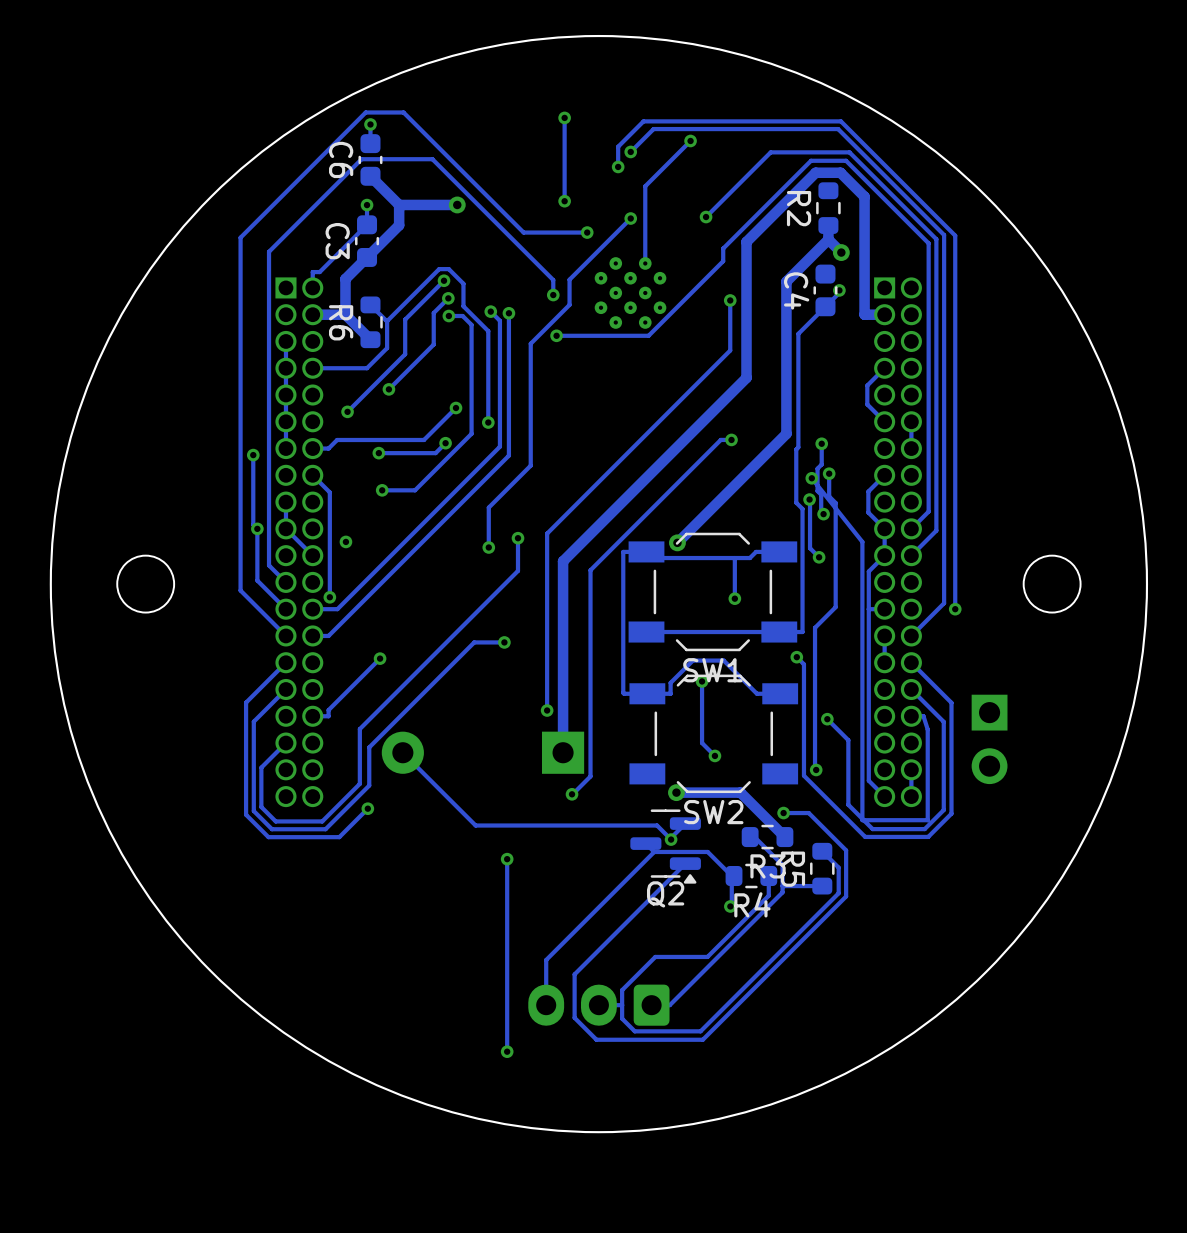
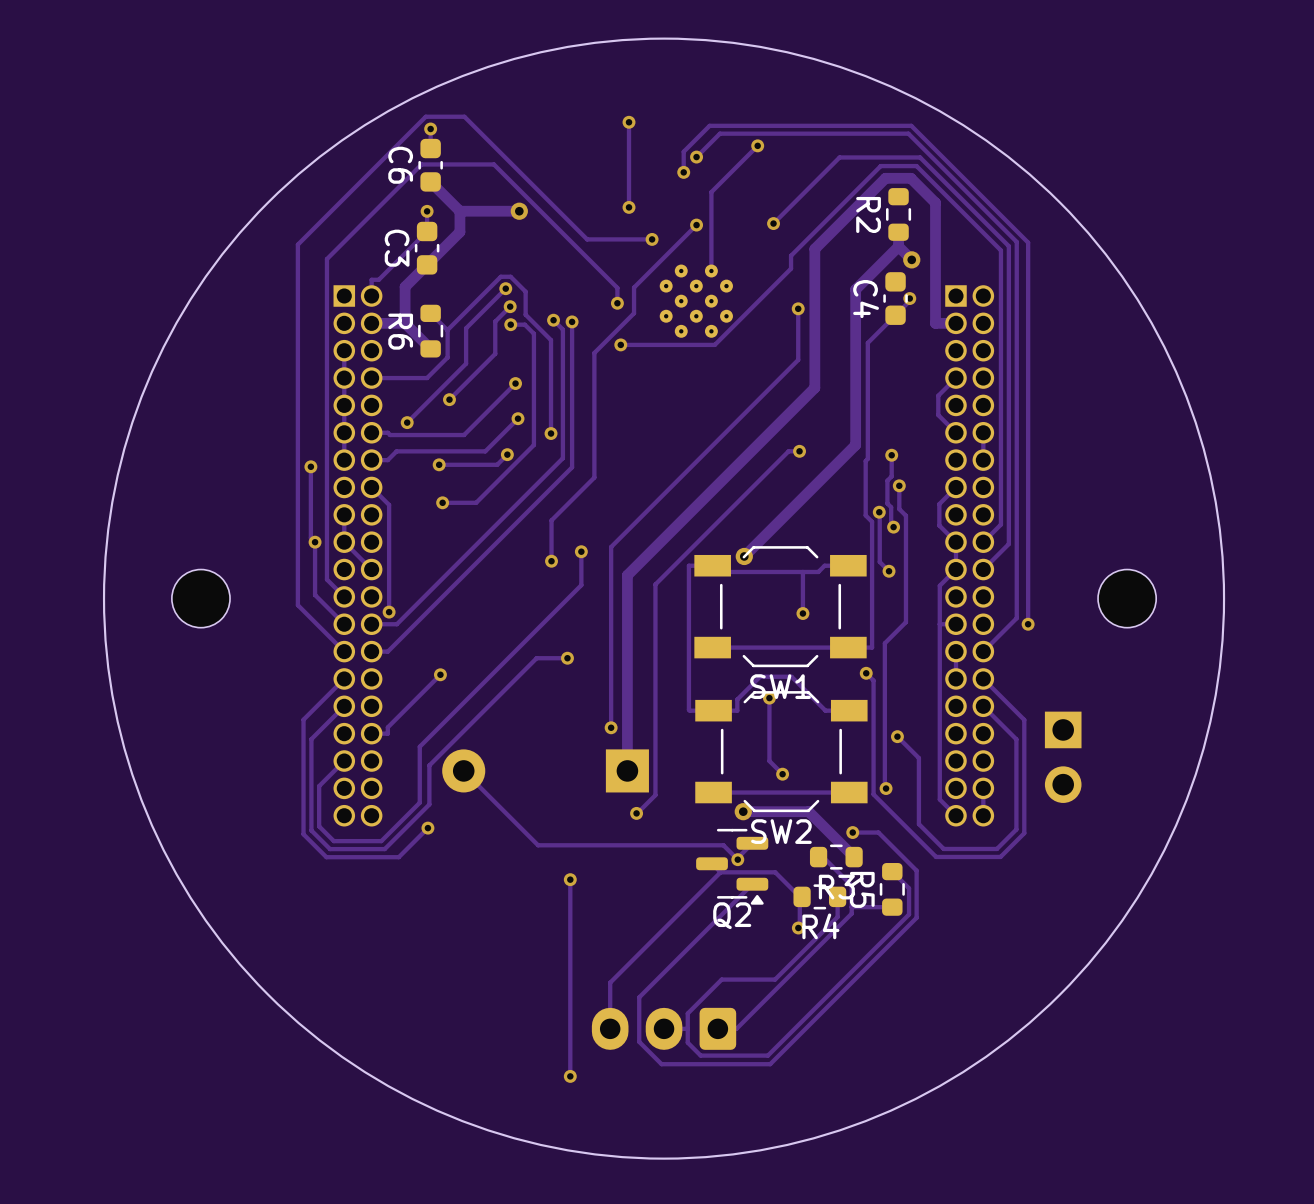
track: none -> (515, 383) (464, 435) (390, 435) (387, 432) (371, 432)
via: none -> (515, 383)
track: (811, 478) (862, 541) (862, 820) (927, 820) (927, 729) (923, 716) (911, 716) -> none
via: (811, 478) -> none
via: (345, 541) -> none
track: none -> (849, 792) (713, 792)

